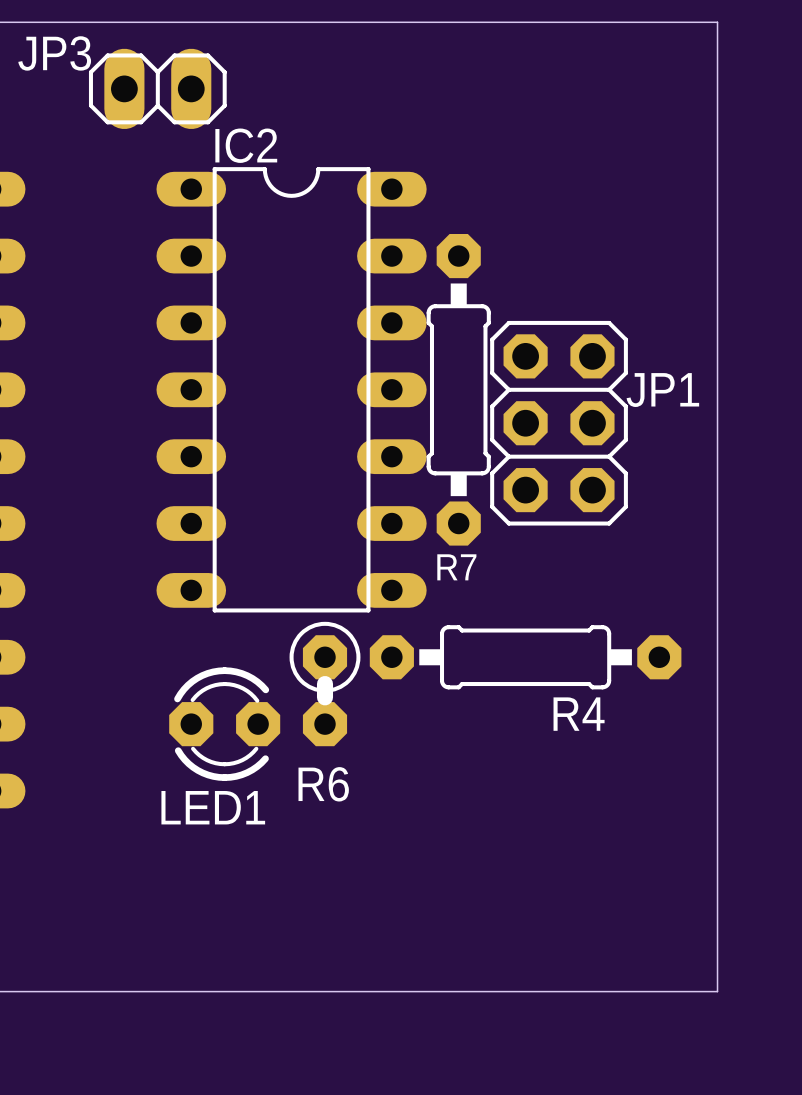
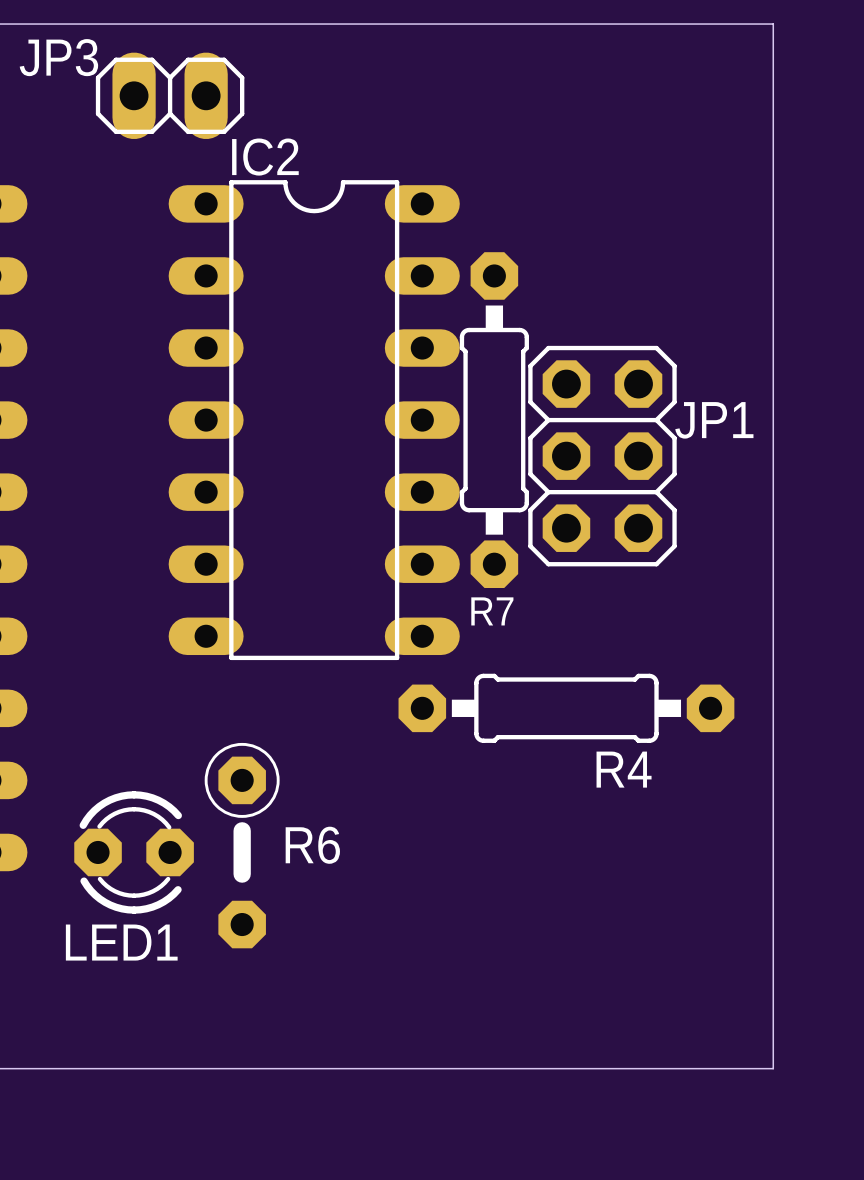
R6 footprint: [289, 621, 361, 747] -> [204, 742, 280, 949]
LED1 position: (224, 724) -> (134, 852)
R6 name position: R6 (323, 784) -> R6 (312, 845)

